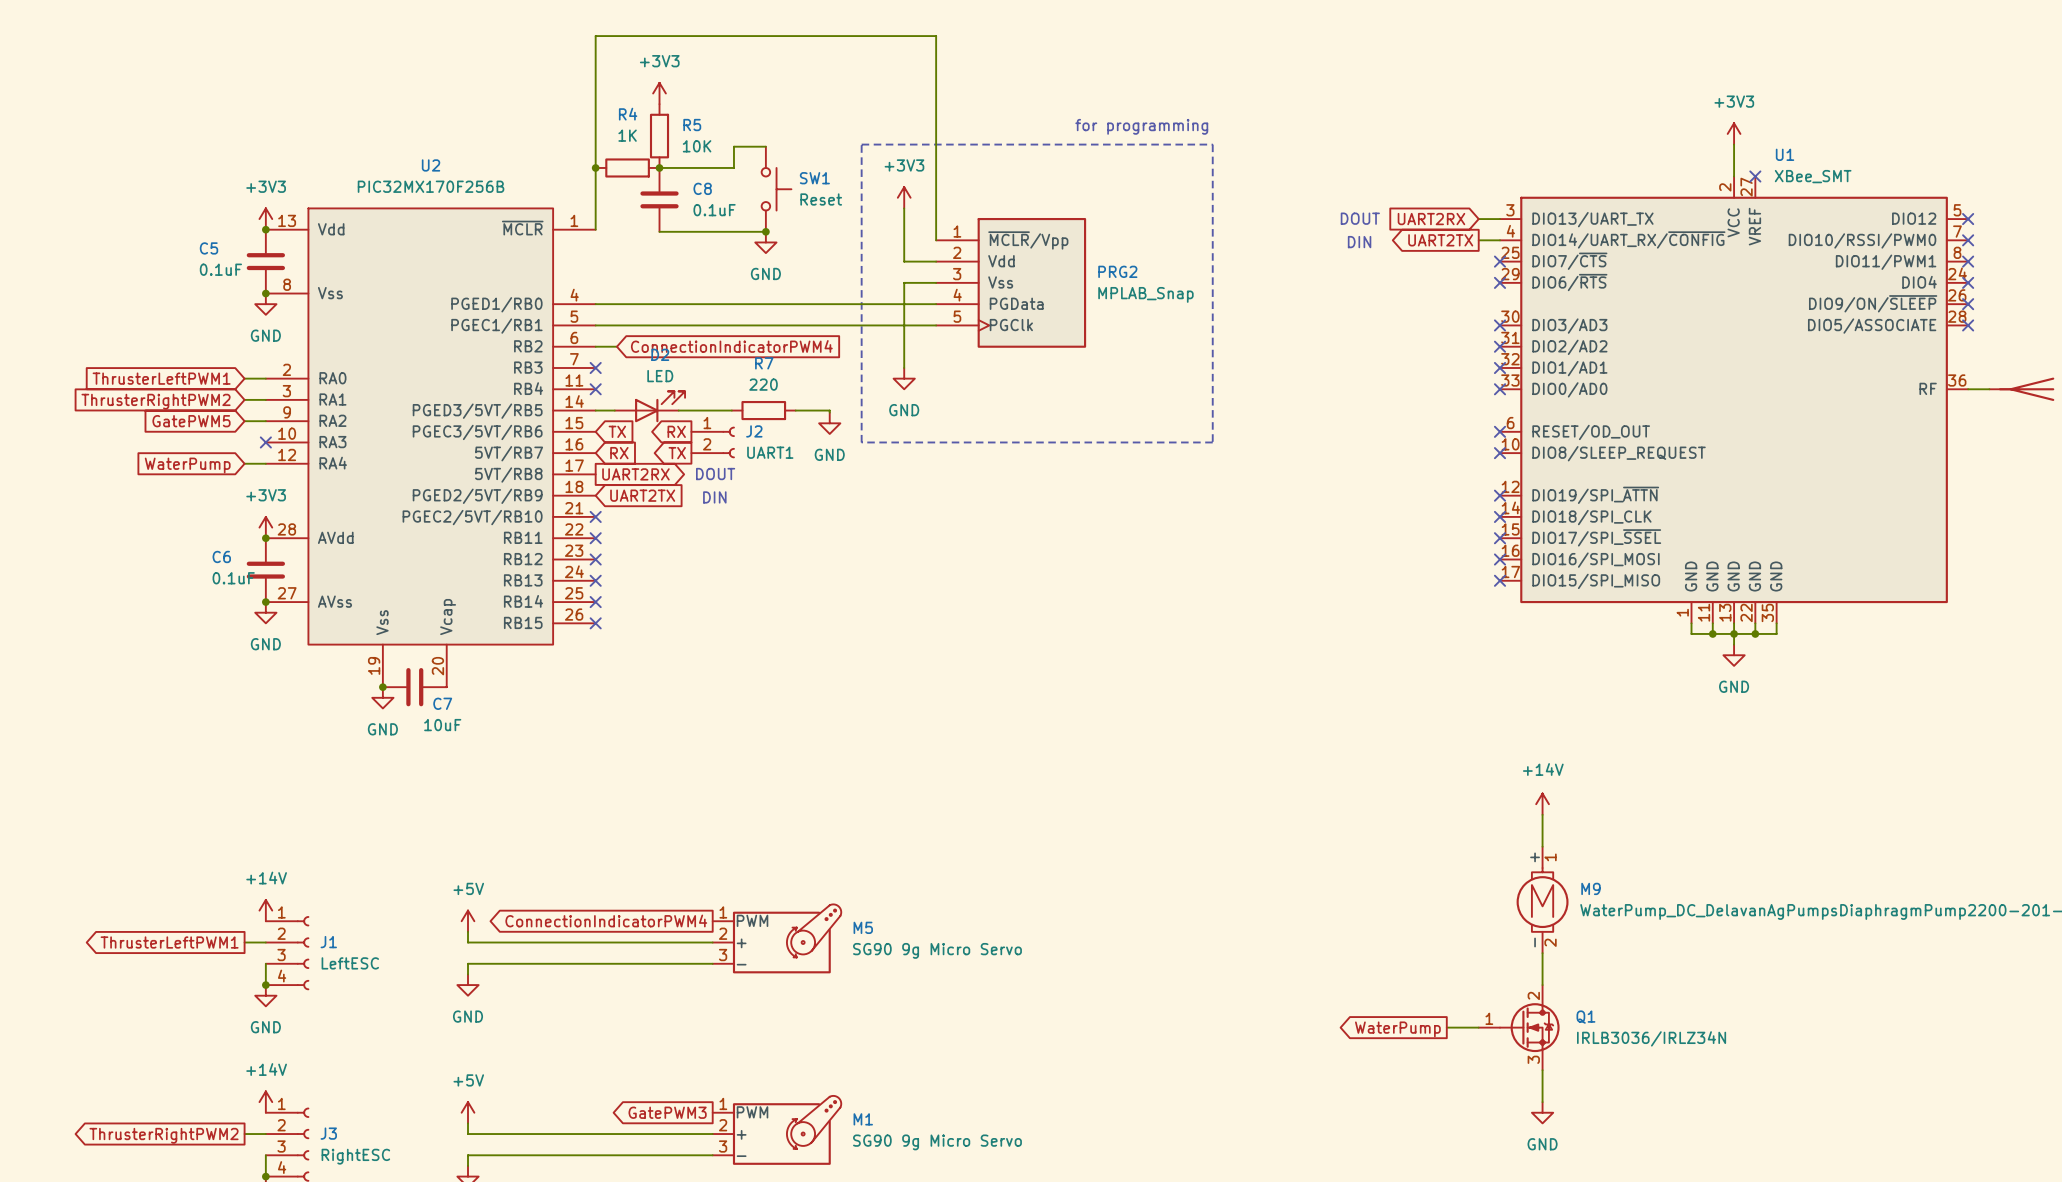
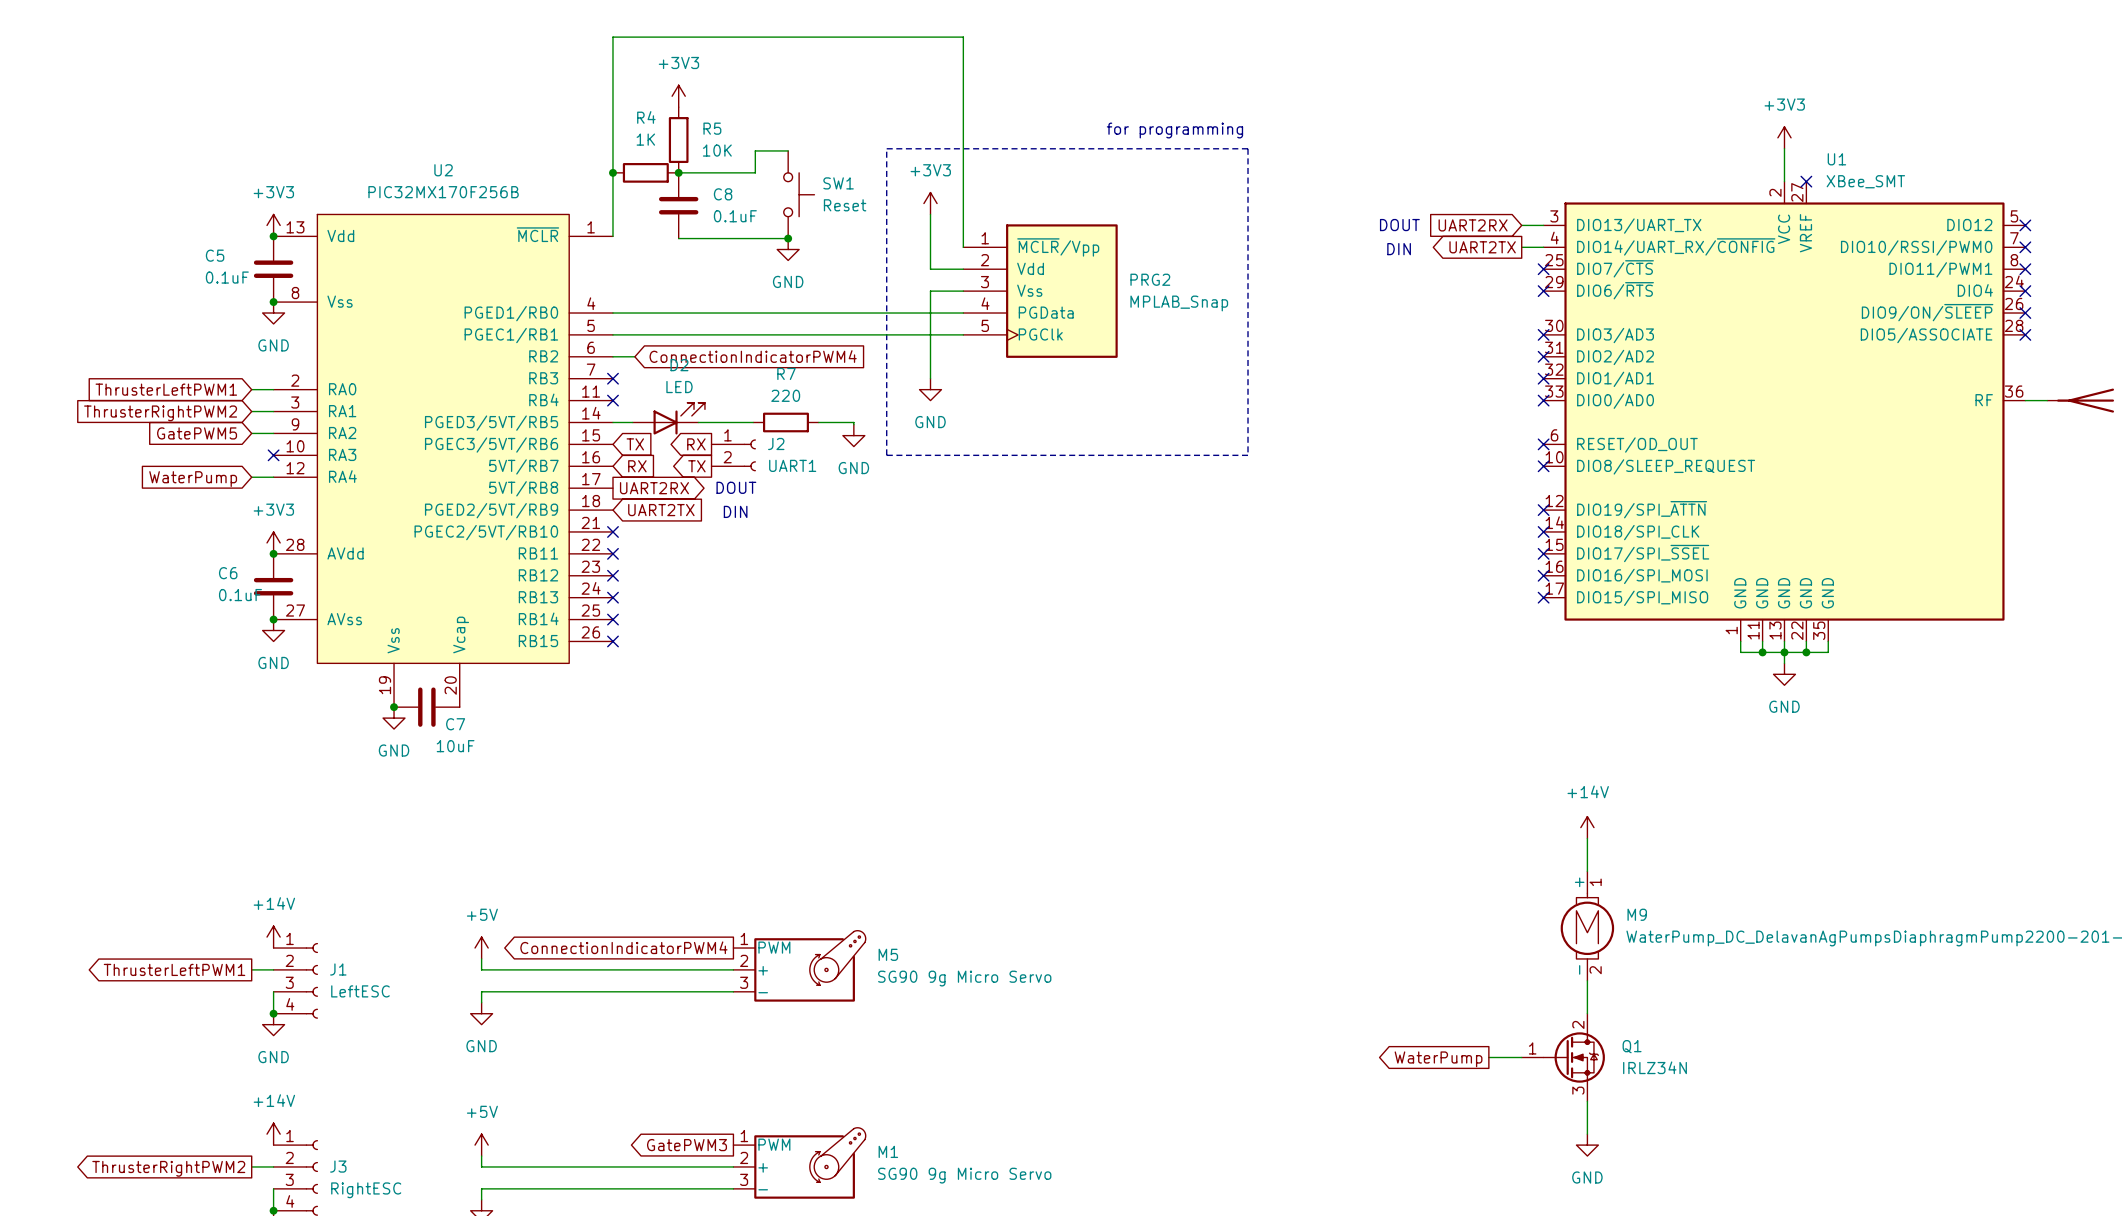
Q1 value: IRLB3036/IRLZ34N (1651, 1038) -> IRLZ34N (1655, 1067)

